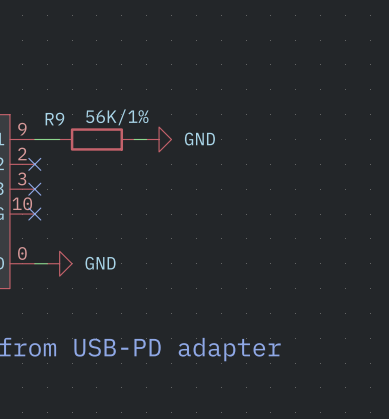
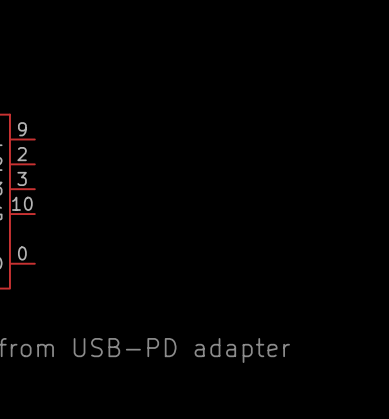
wire: (34, 139) (59, 139) -> none
R9: 56K/1% (96, 139) -> none
wire: (134, 139) (146, 139) -> none
power symbol: GND (159, 139) -> none
no-connect mark: (34, 164) -> none
no-connect mark: (34, 189) -> none
no-connect mark: (34, 214) -> none
wire: (34, 263) (47, 263) -> none
power symbol: GND (59, 263) -> none

